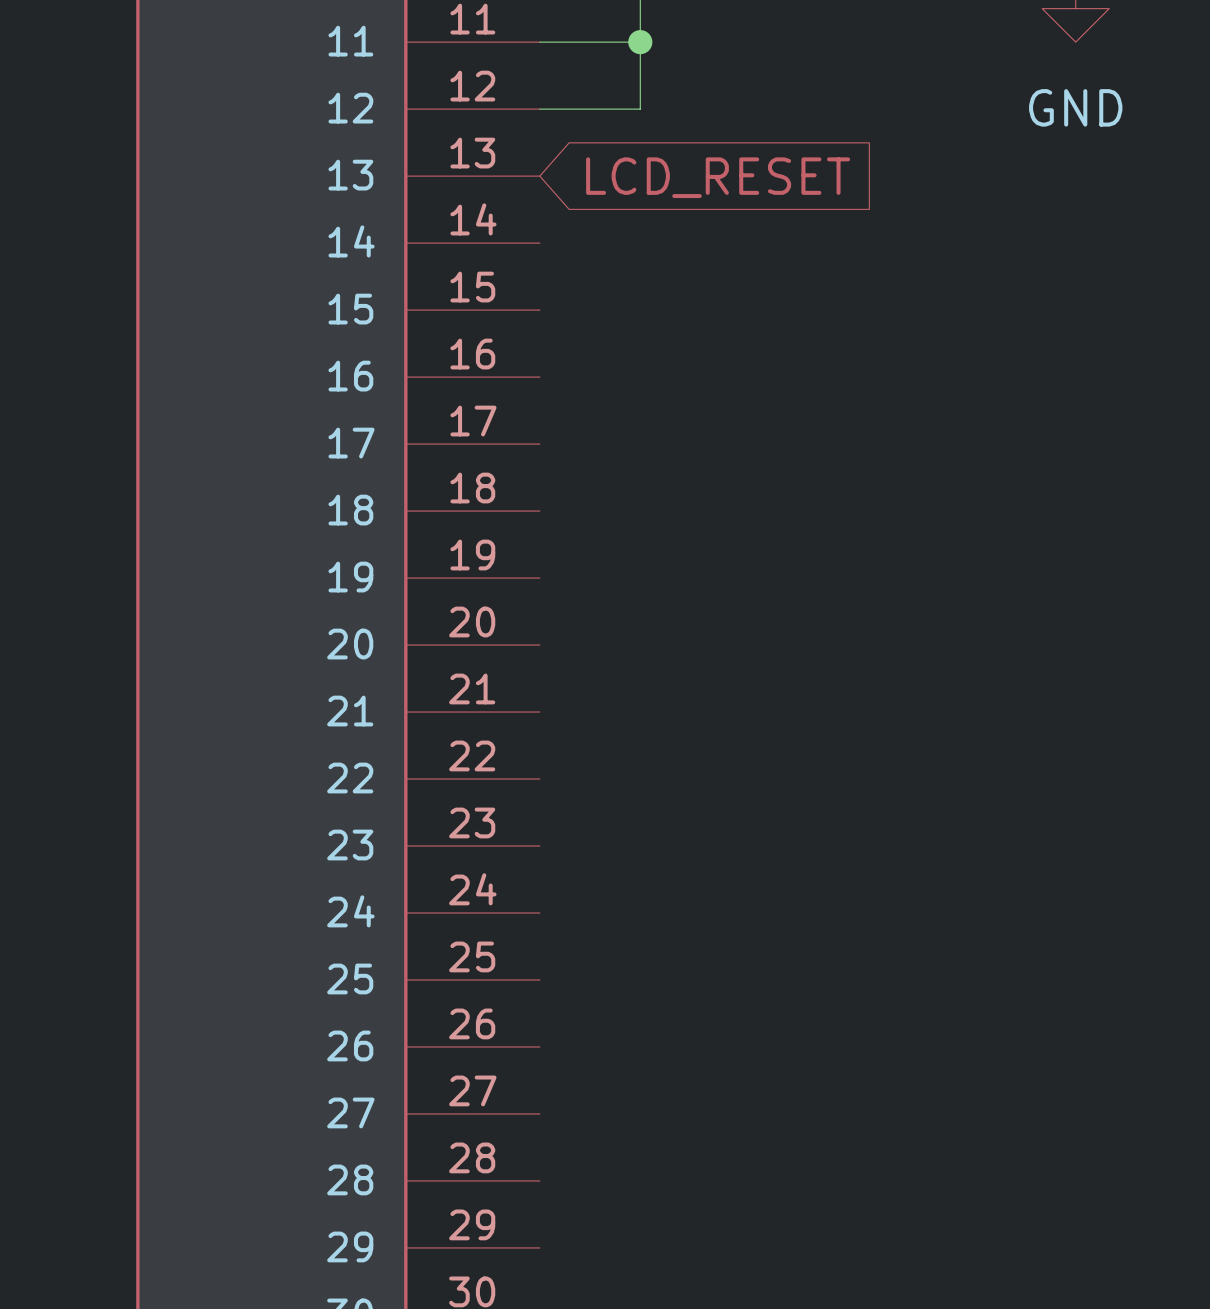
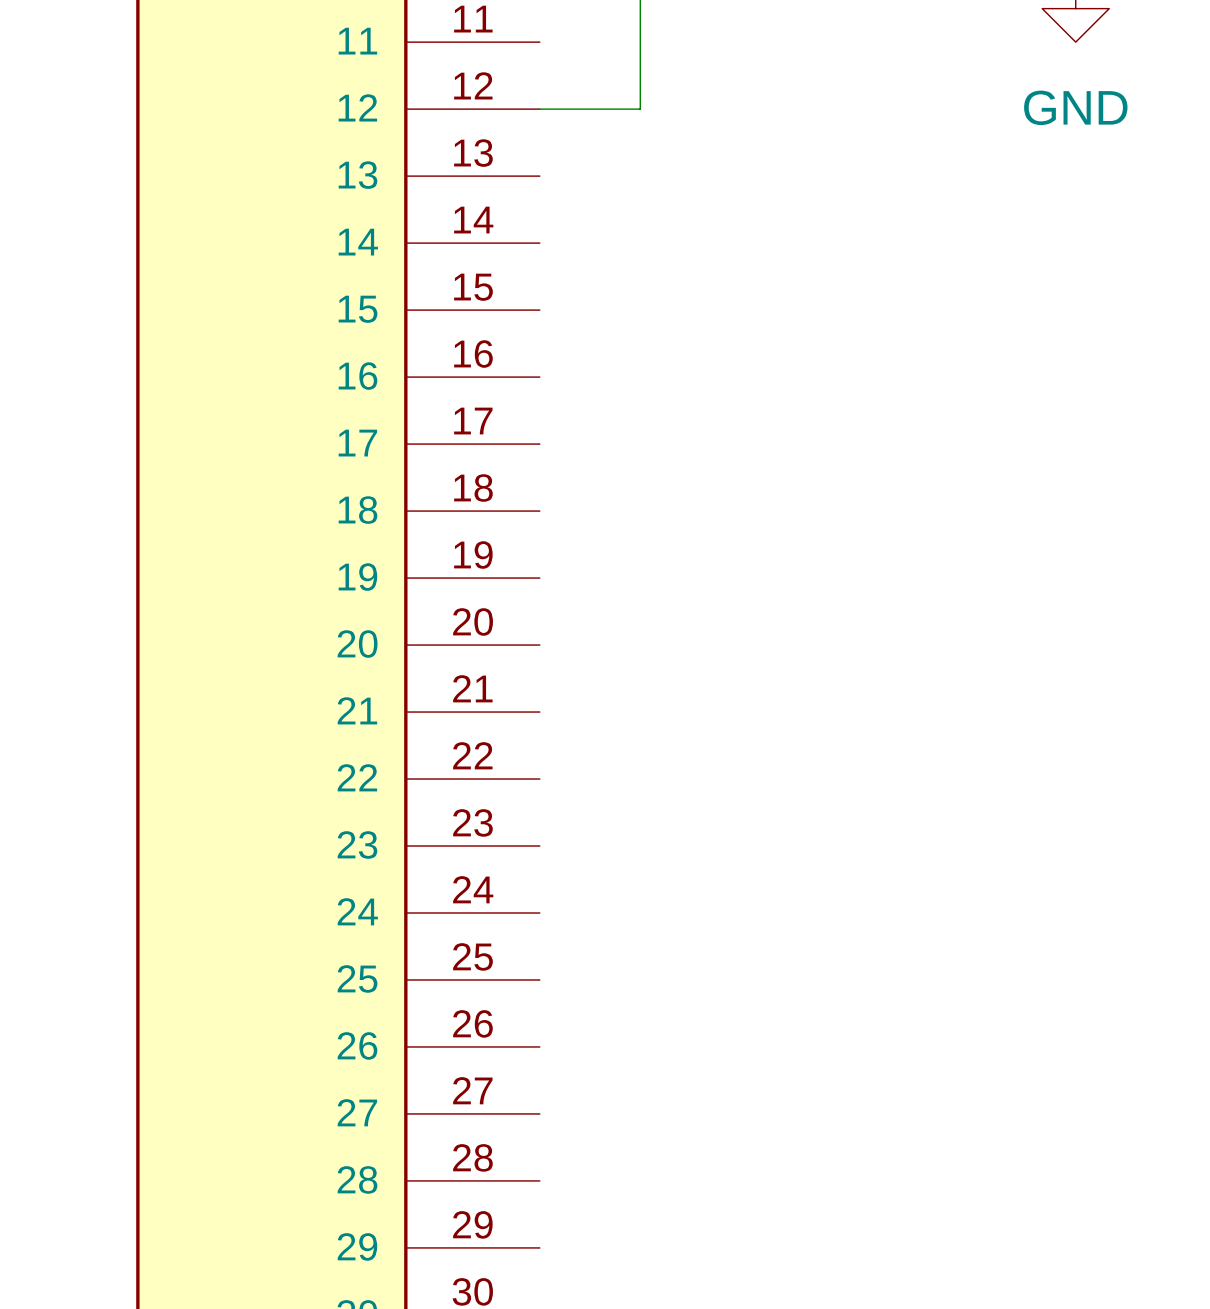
wire: (539, 42) (640, 42) -> none
junction: (640, 42) -> none
global label: LCD_RESET (718, 177) -> none

